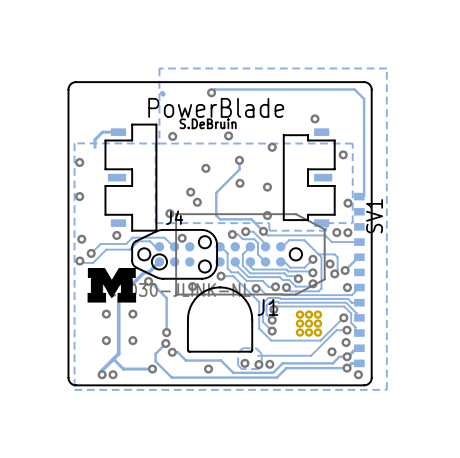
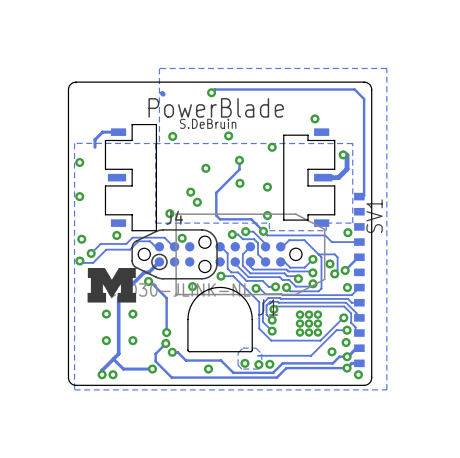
track: none -> (347, 154) (347, 169) (338, 177) (323, 177)
via: (348, 203) -> none
via: (336, 232) -> none

